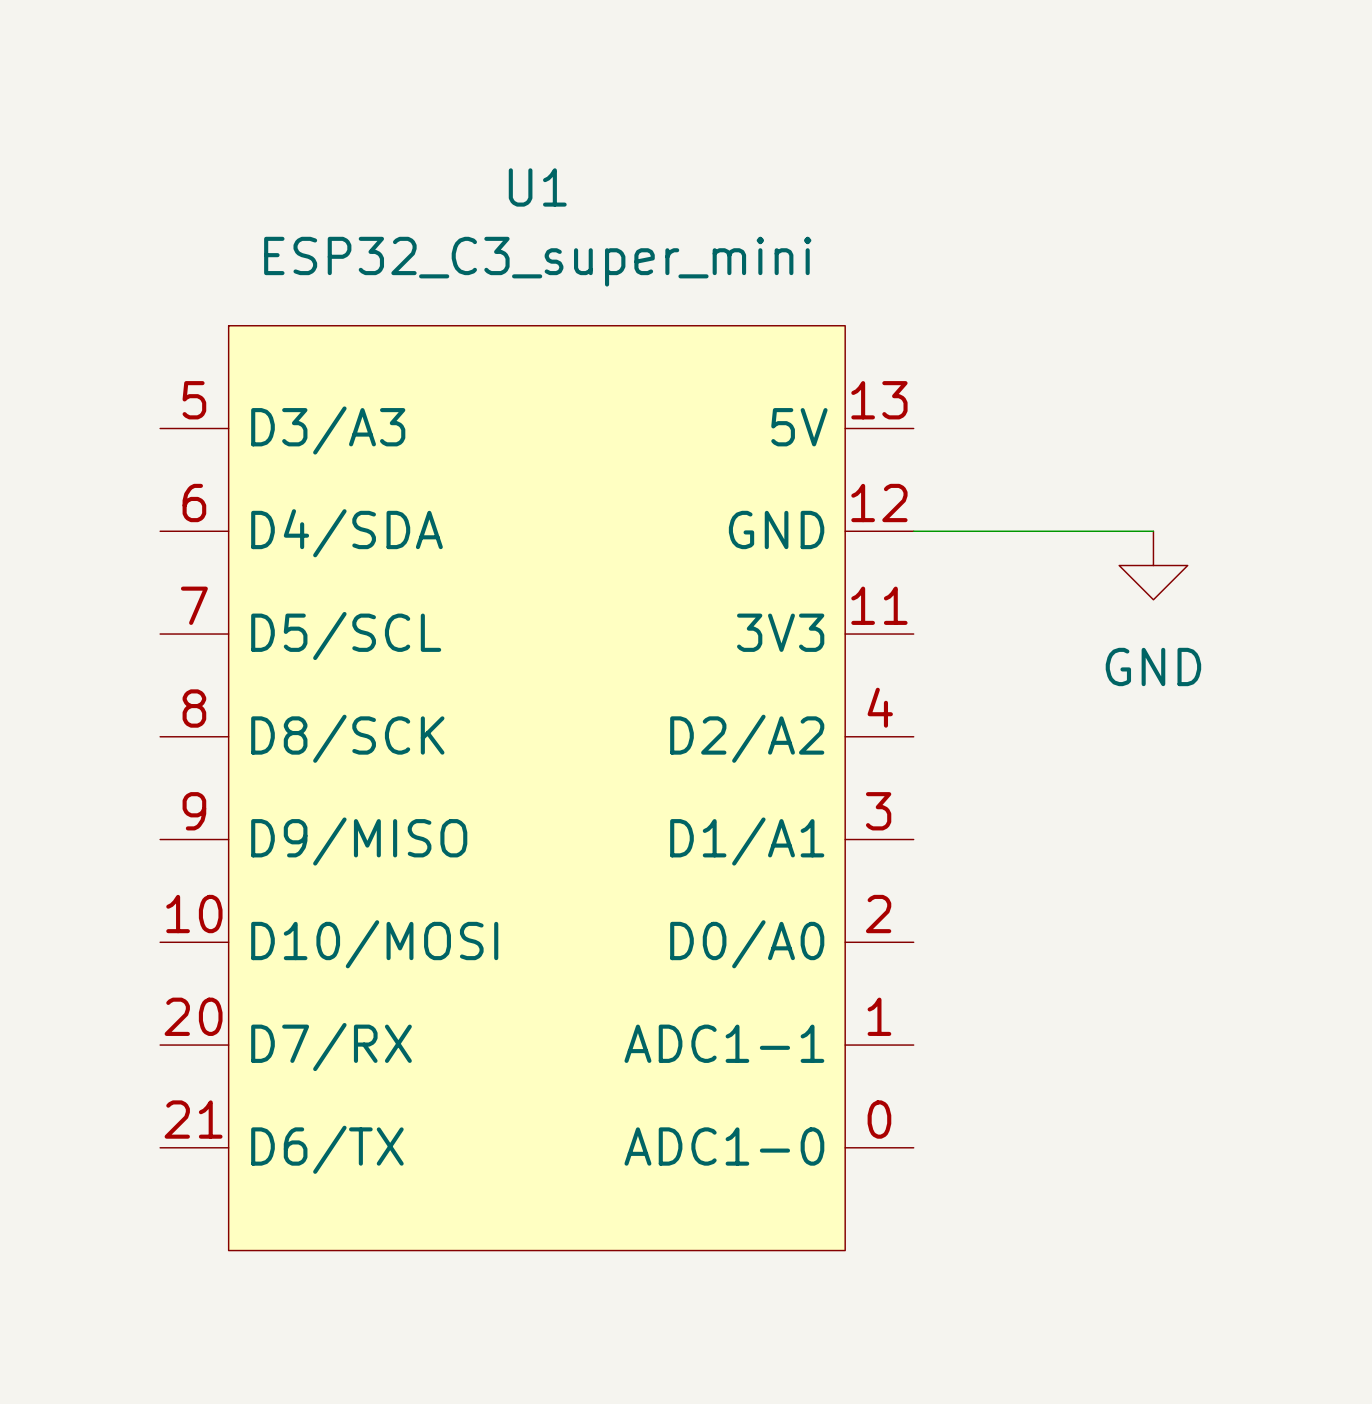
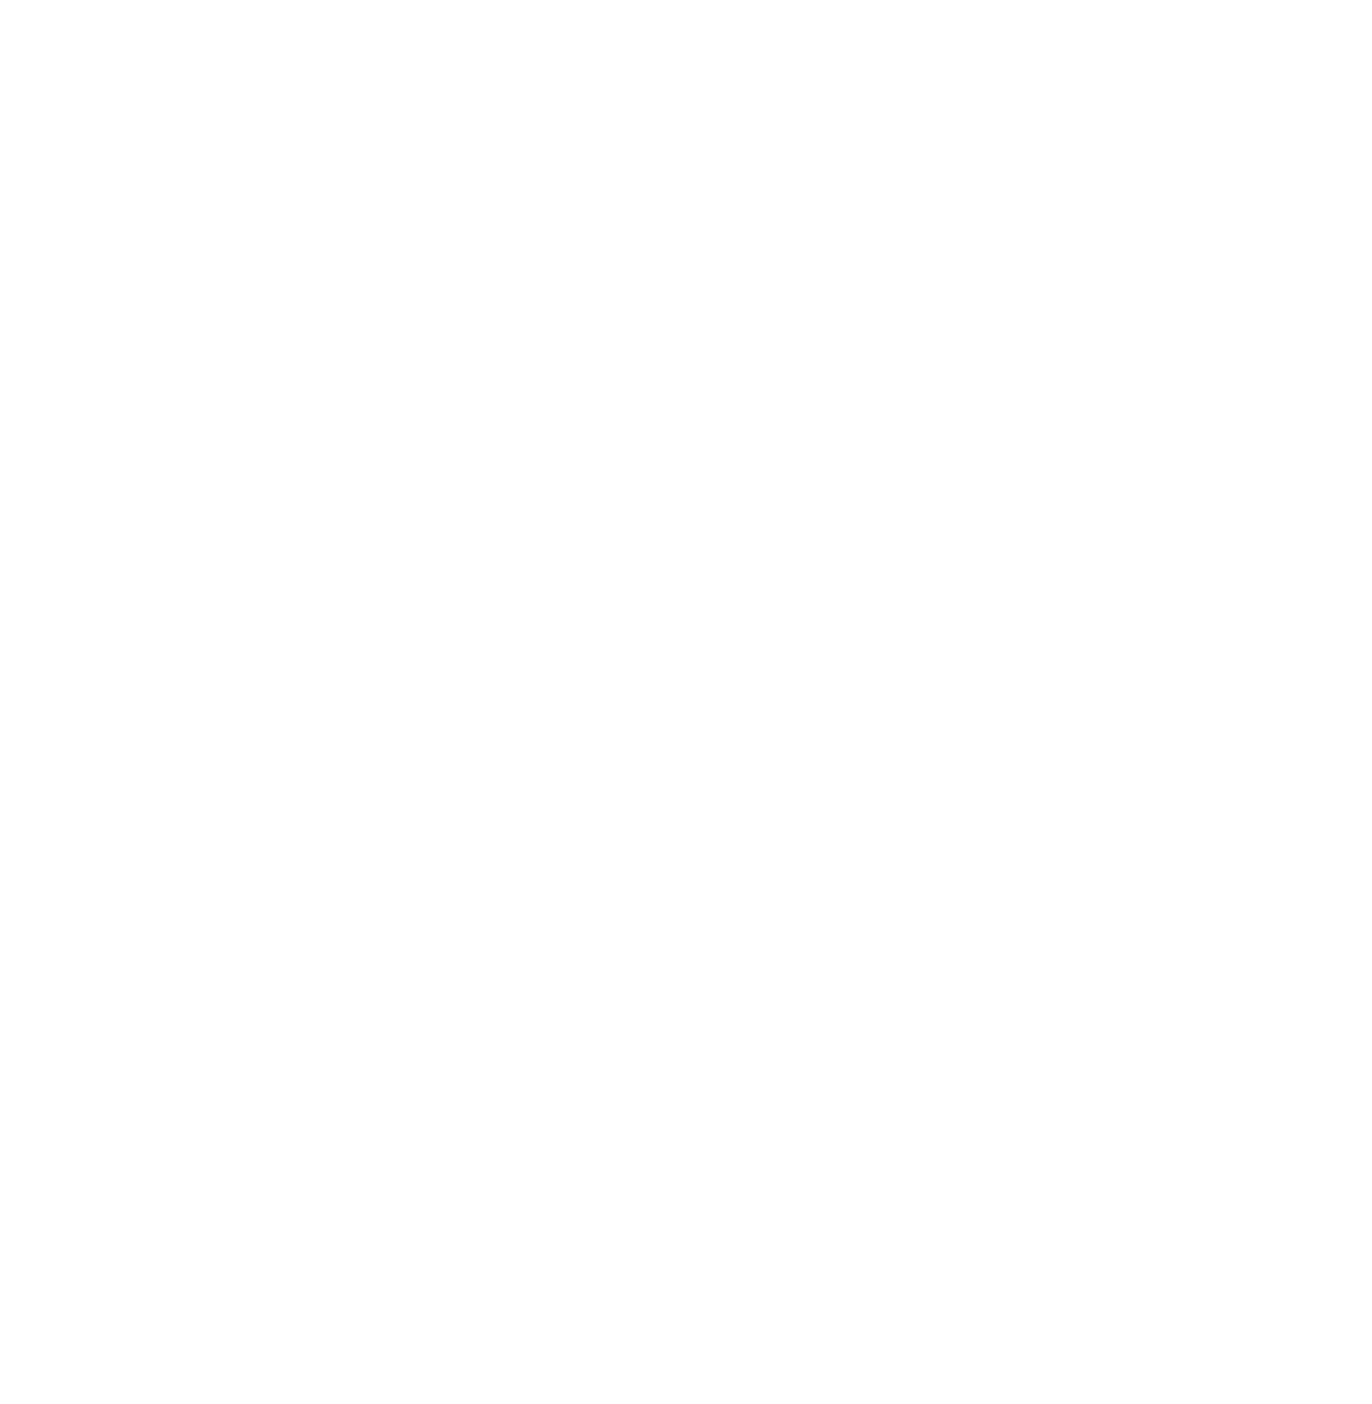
wire: (913, 531) (1153, 531) -> none
power symbol: GND (1153, 565) -> none
U1: ESP32_C3_super_mini (536, 788) -> none

